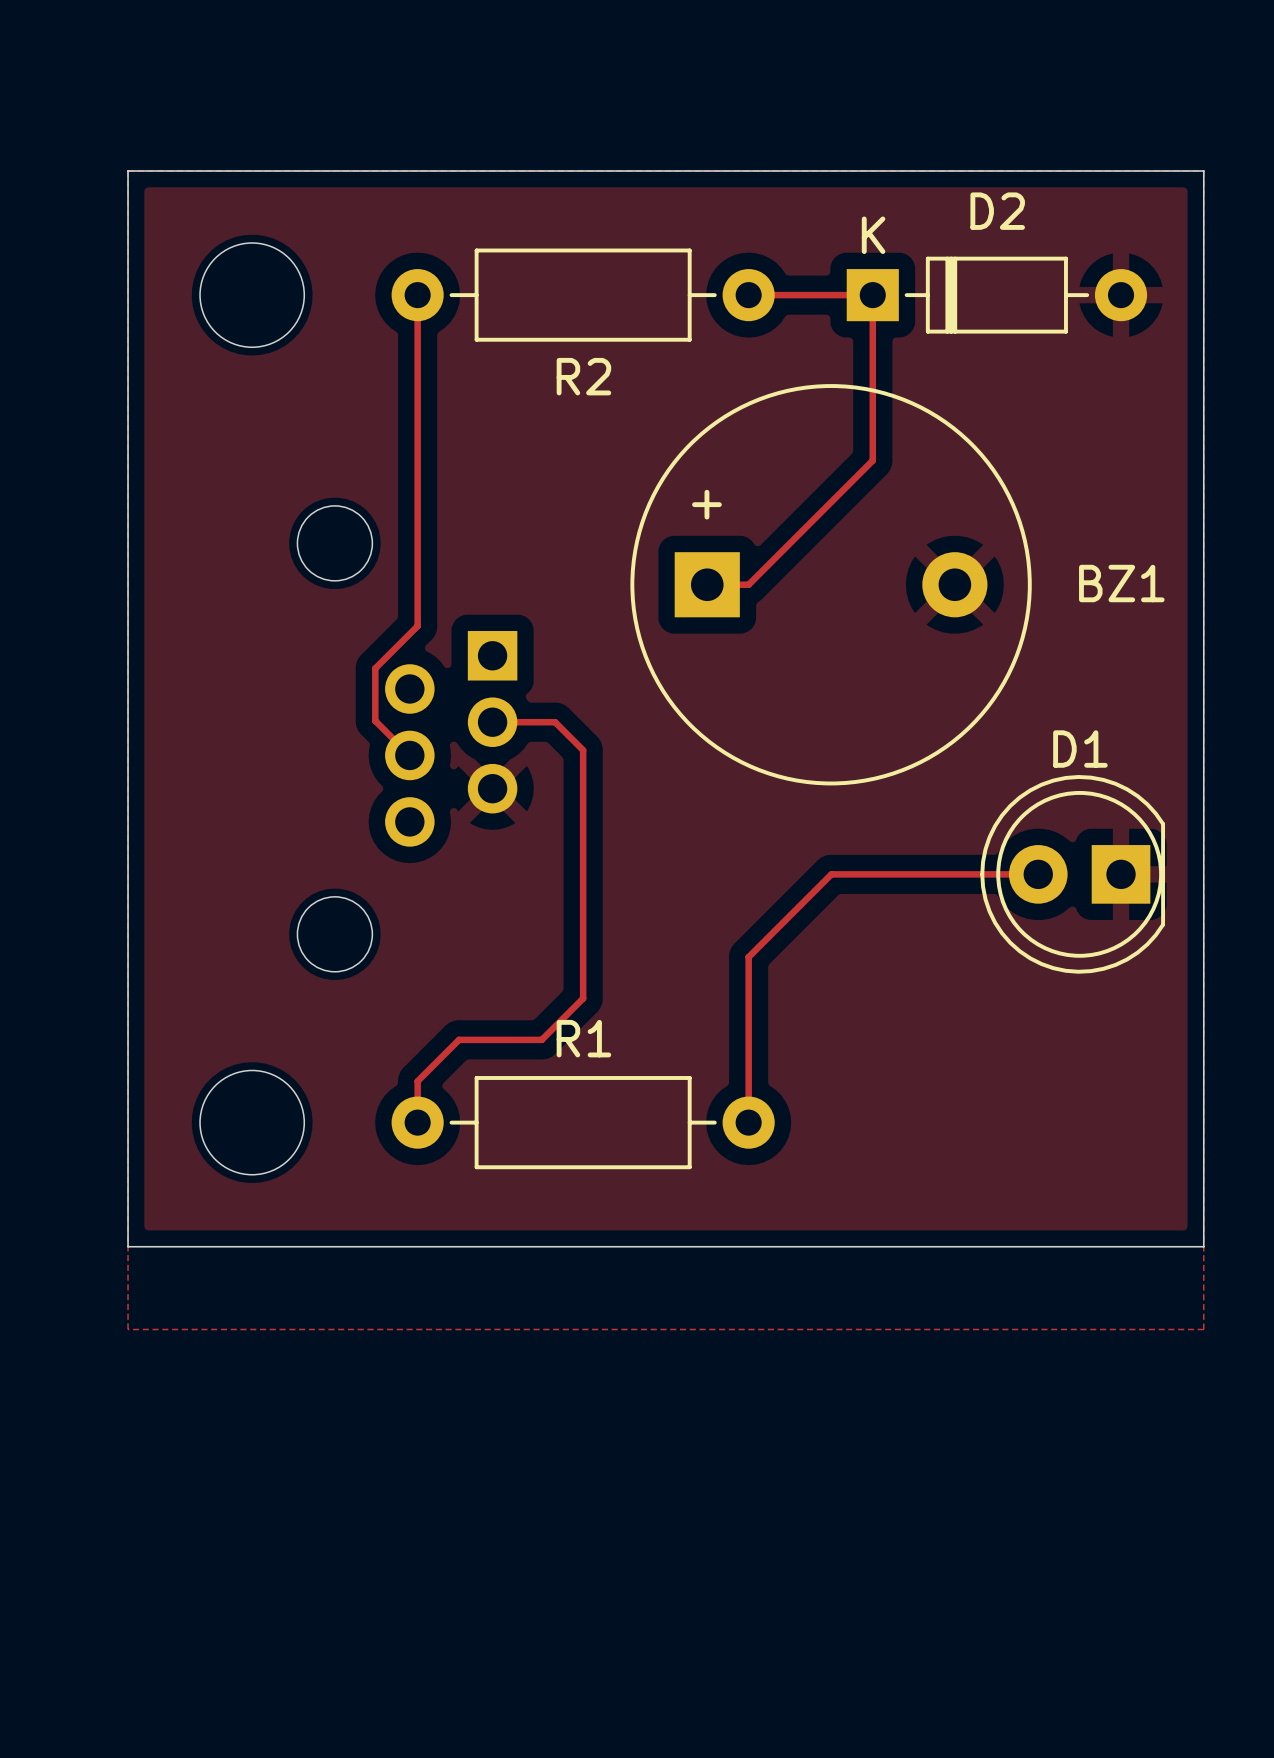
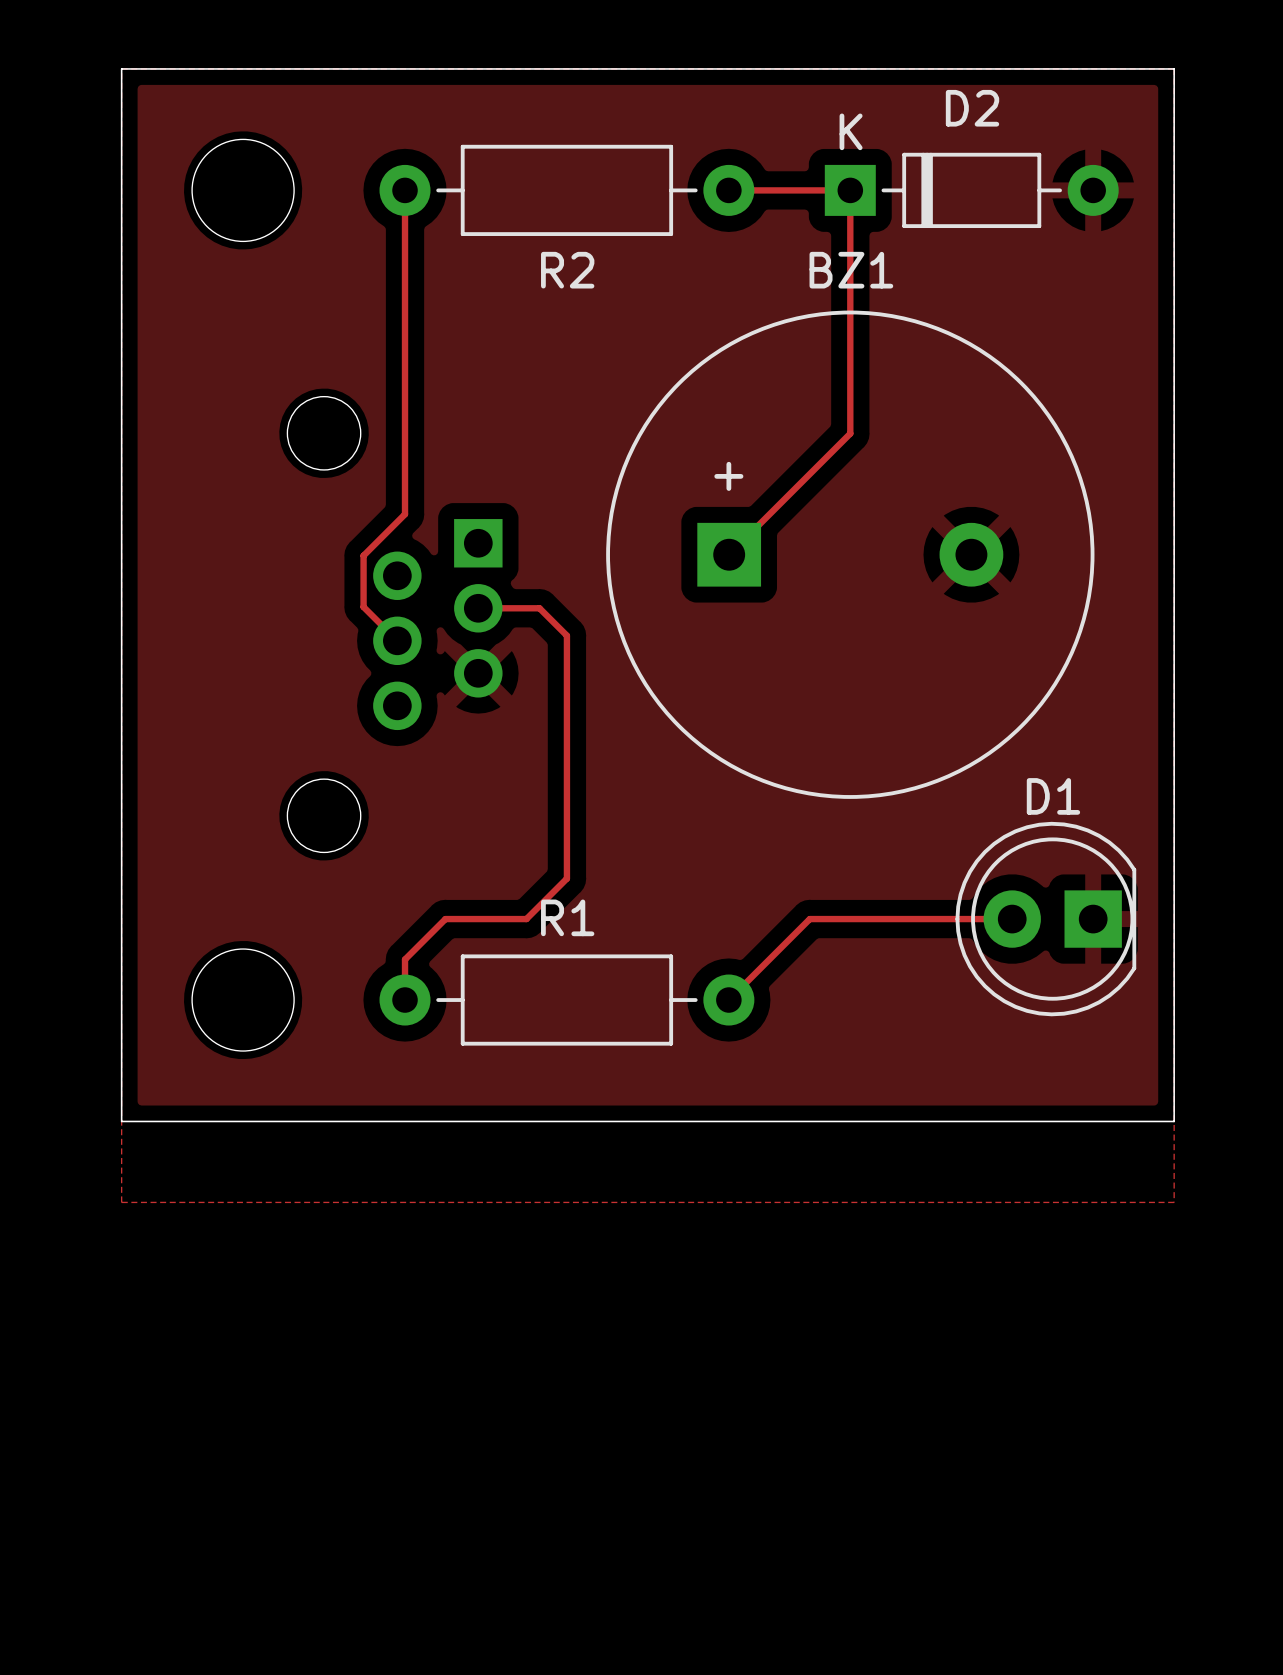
BZ1 footprint: [630, 384, 1032, 786] -> [606, 310, 1095, 799]
track: (872, 460) (748, 584) (707, 584) -> (850, 352) (850, 433) (729, 554)
BZ1 name position: BZ1 (1121, 583) -> BZ1 (851, 270)
track: (1038, 874) (831, 874) (748, 957) (748, 1122) -> (1012, 919) (809, 919) (728, 1000)
D1 position: (1072, 874) -> (1045, 919)

